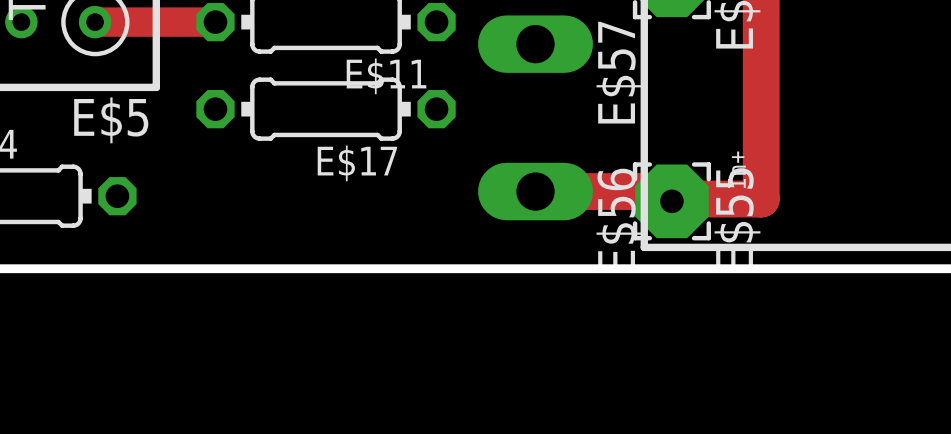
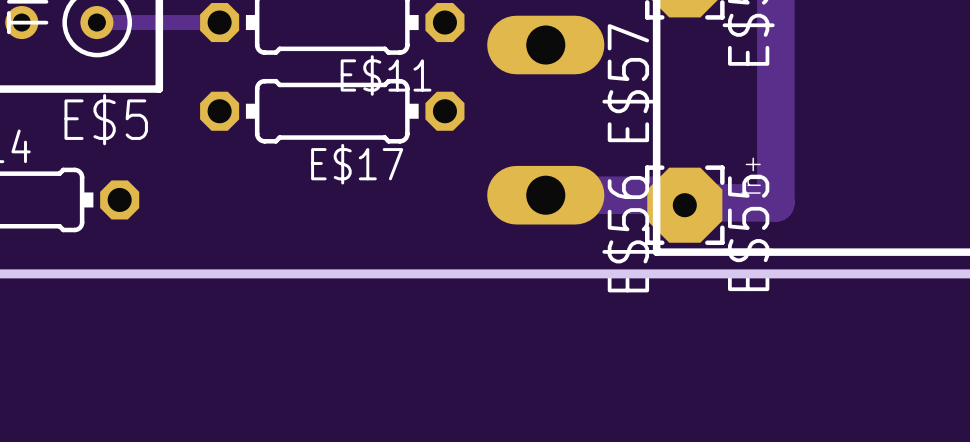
track width: thick (95, 22) (215, 22) -> thin (96, 22) (219, 22)

